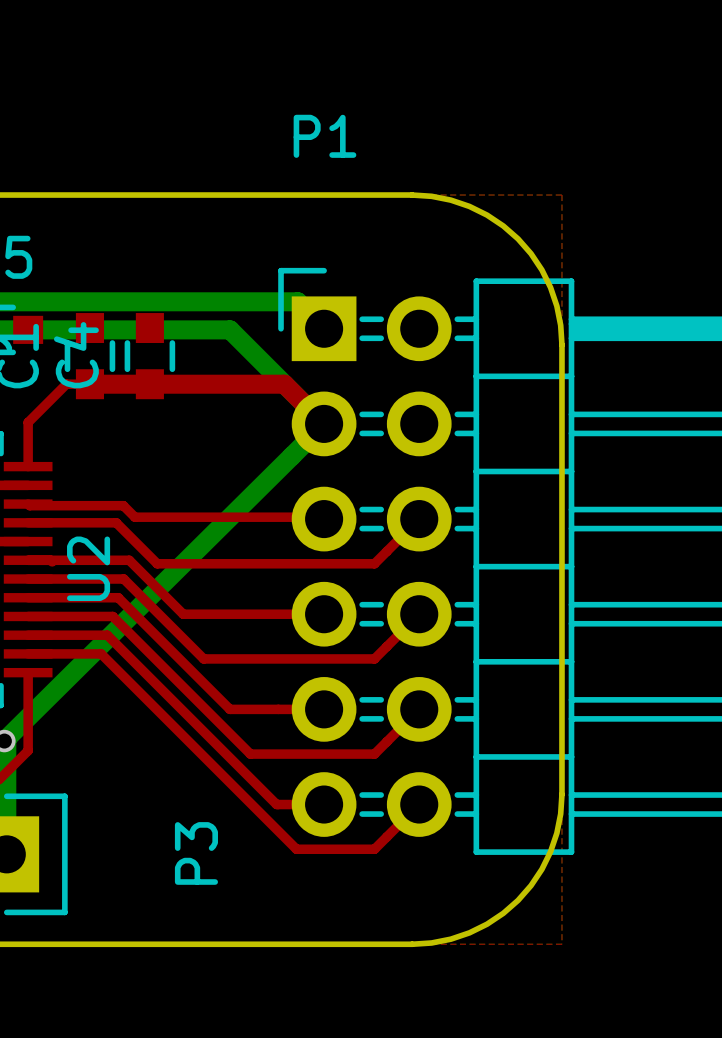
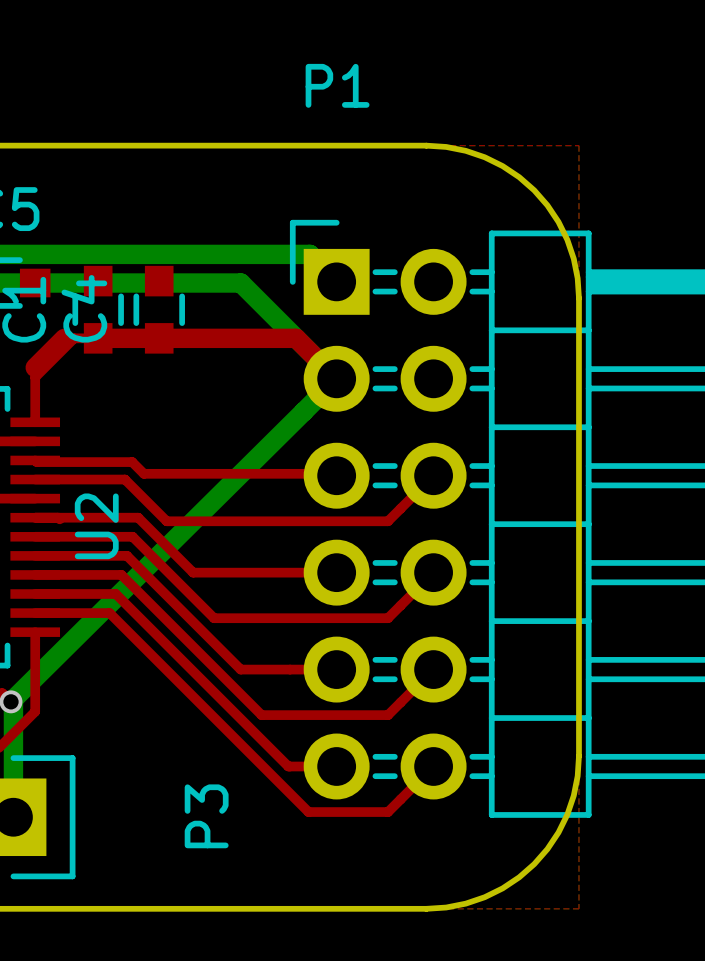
top track: none -> (64, 338) (35, 367)

